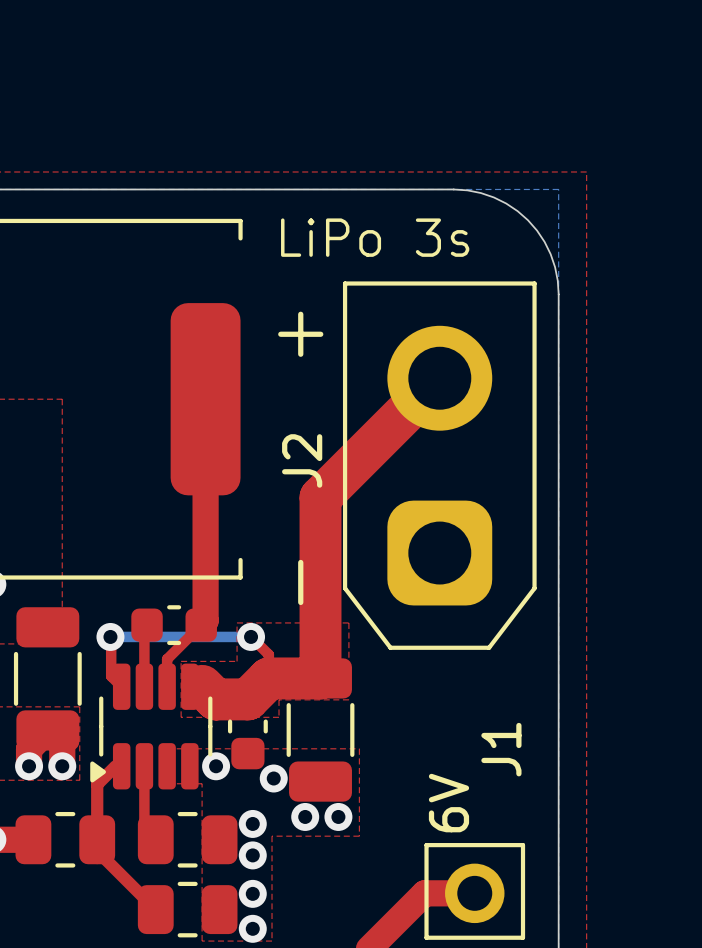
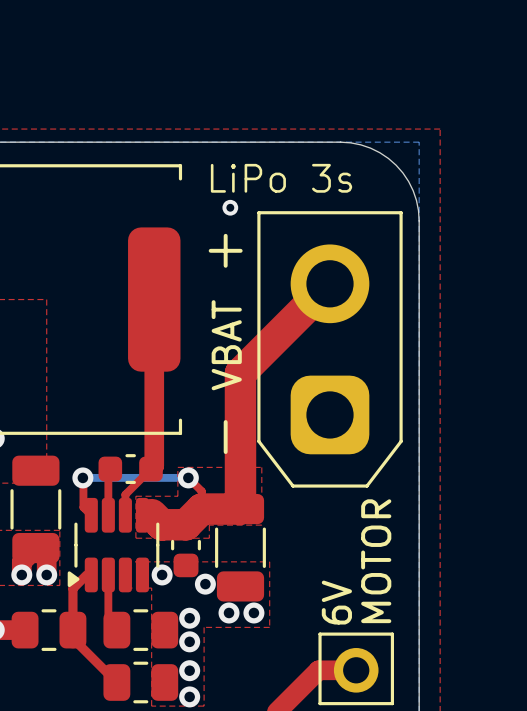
via: none -> (230, 207)
J2 name: J2 (302, 460) -> VBAT (226, 345)
J1 name: J1 (501, 749) -> MOTOR (376, 561)

